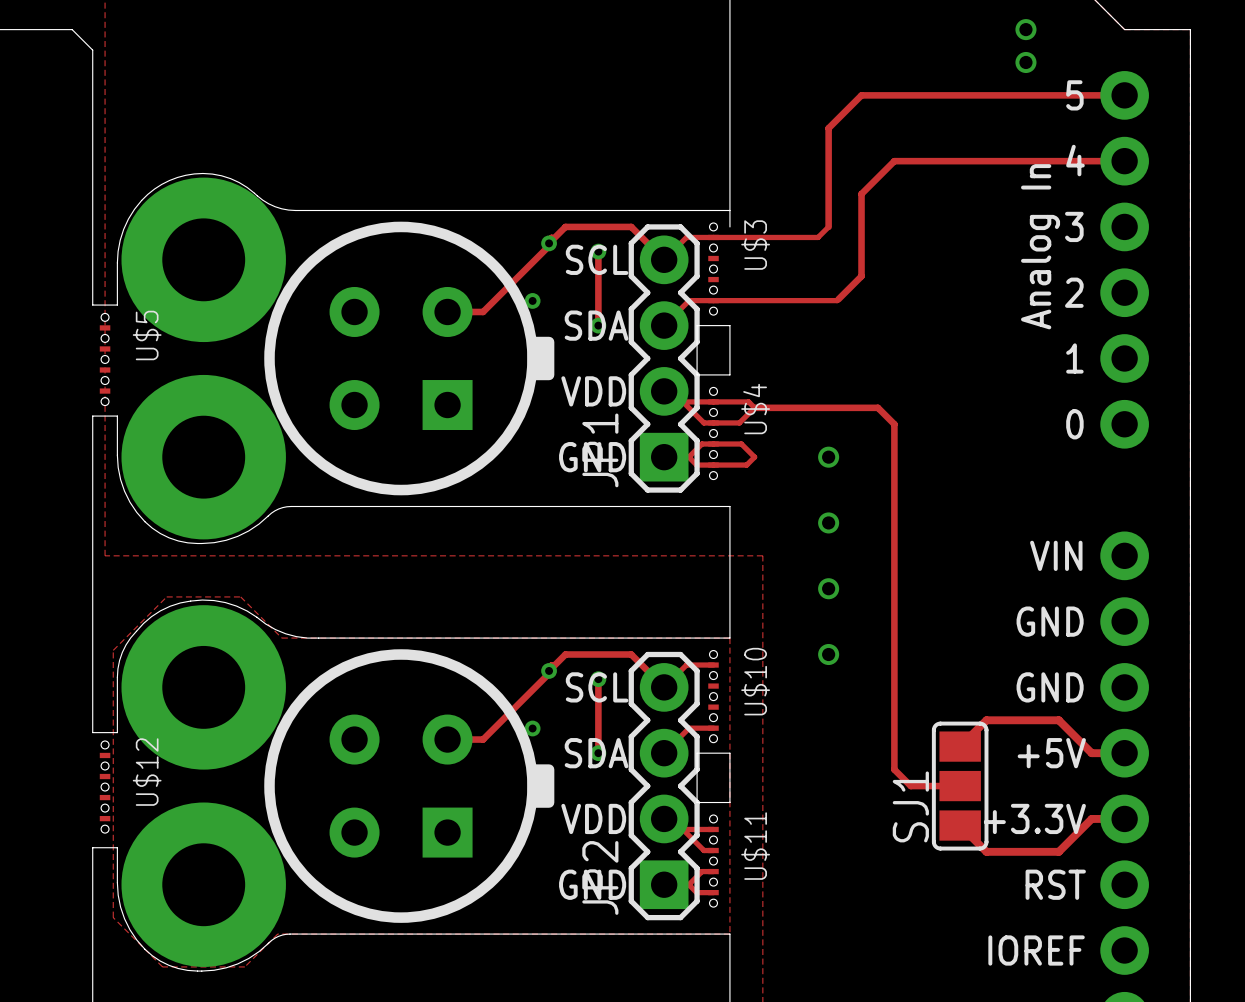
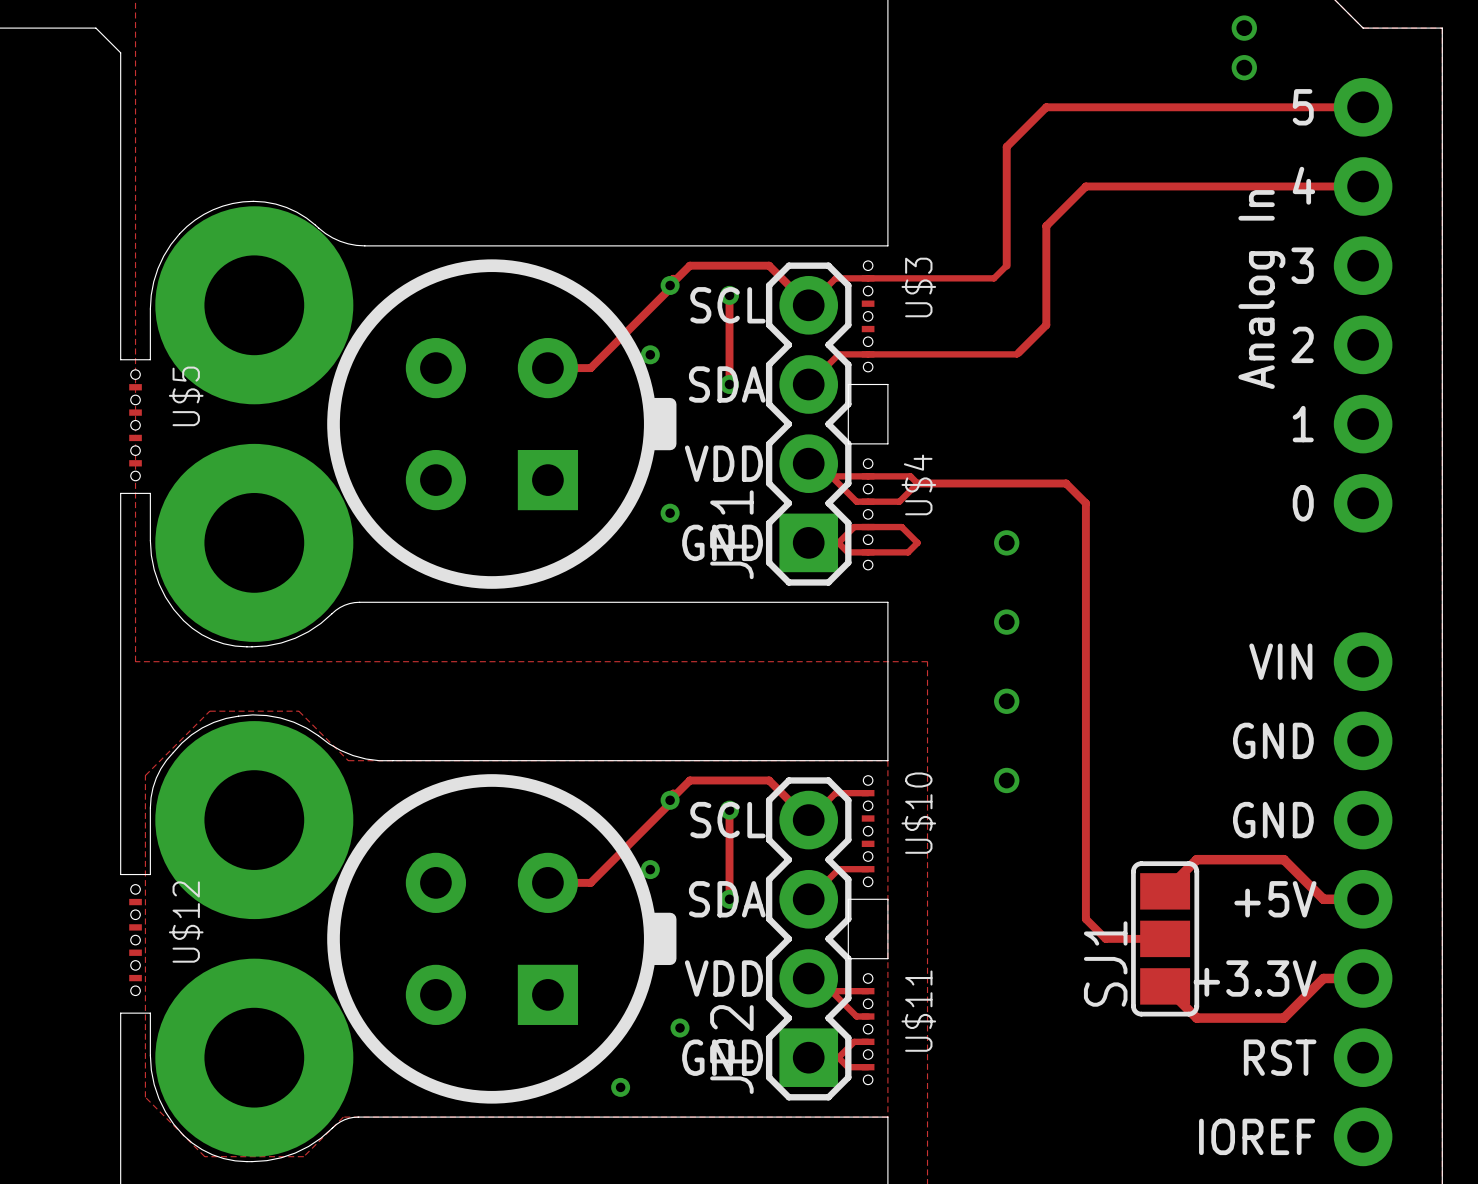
board edge: (729, 210) (729, 226) -> none
via: none -> (670, 513)
via: none -> (680, 1027)
via: none -> (620, 1087)

